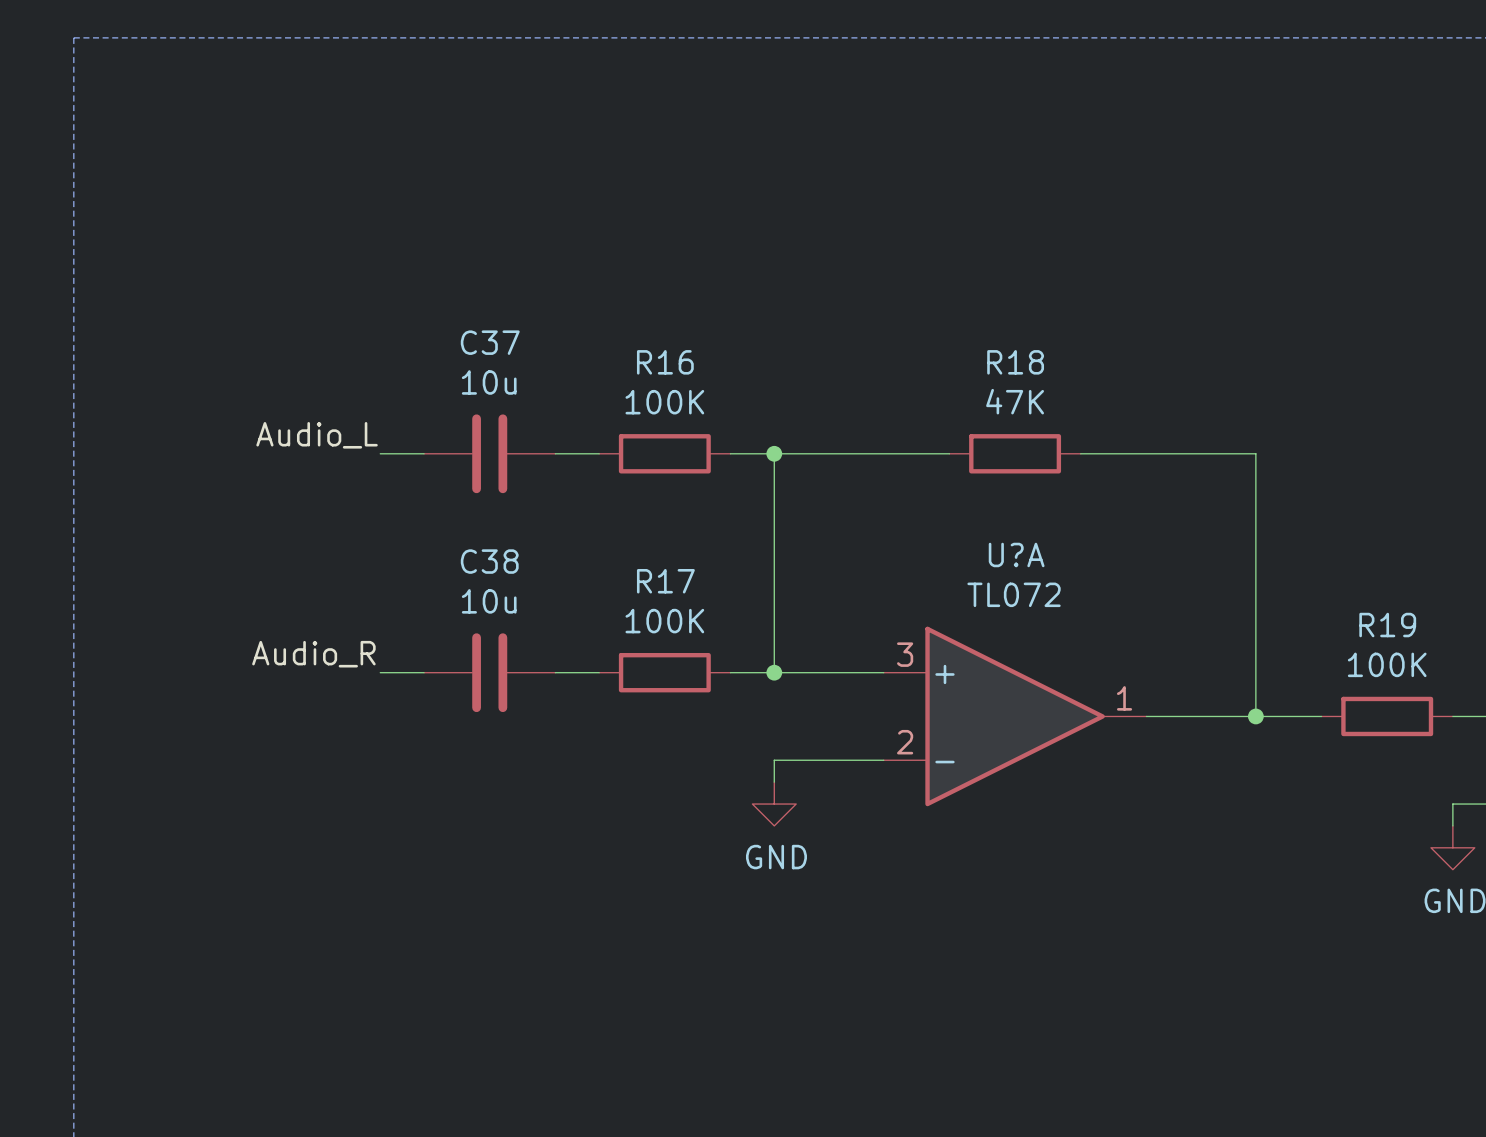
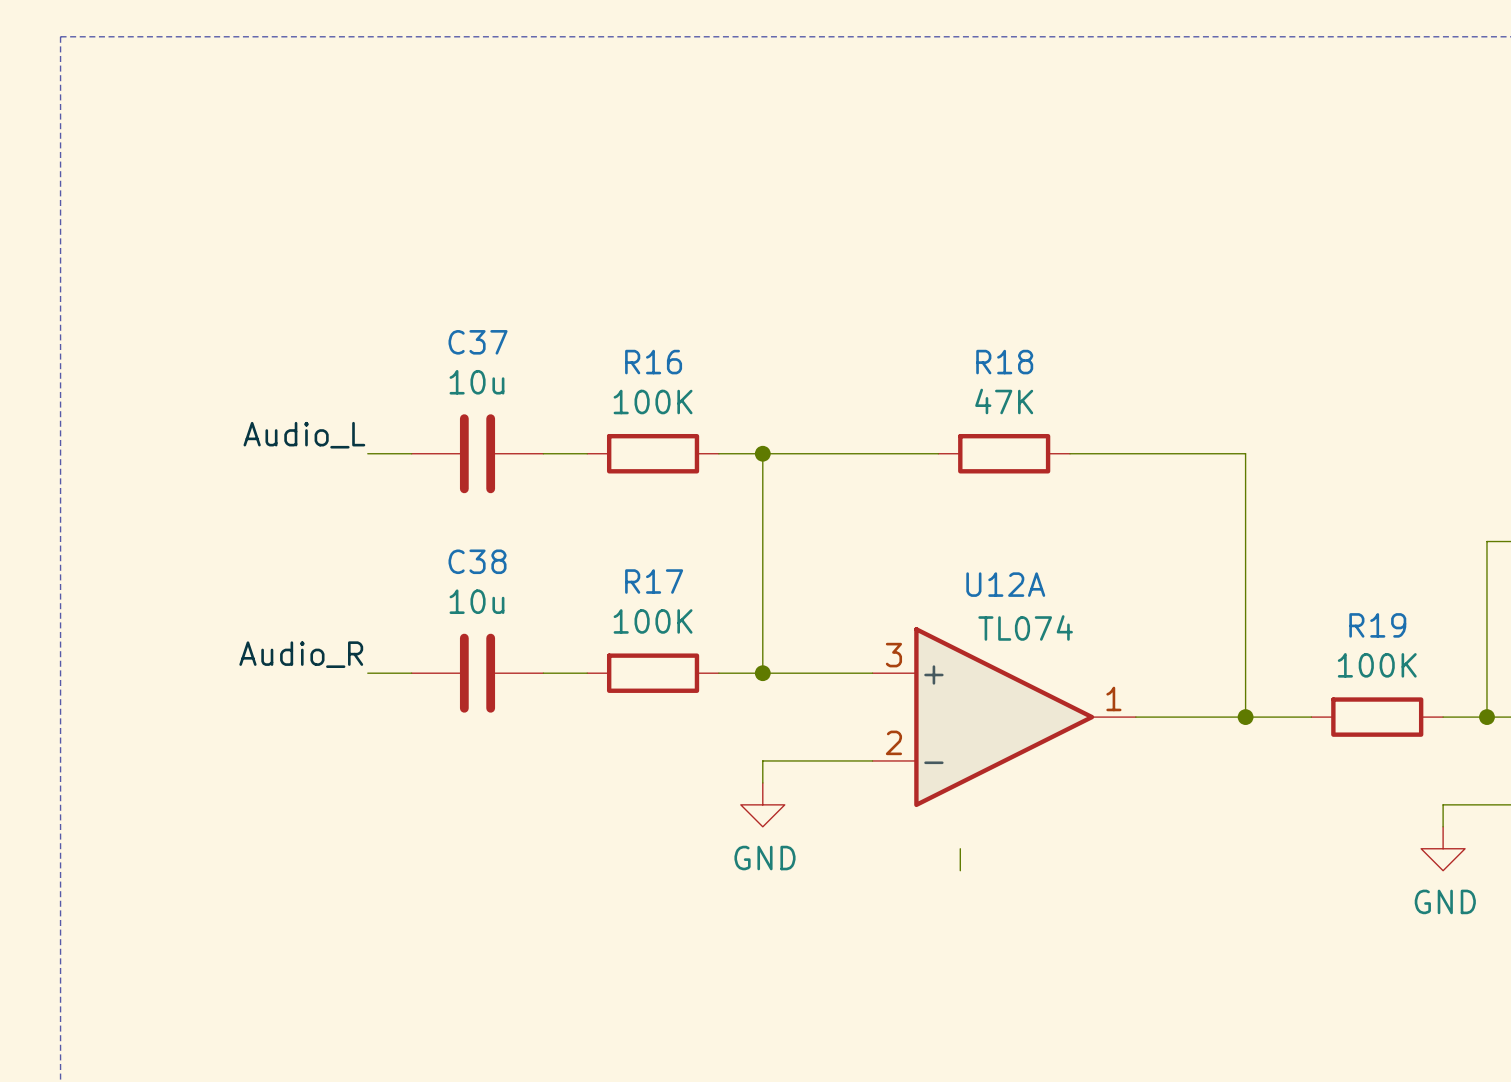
U?A name: U?A (1016, 554) -> U12A (1005, 584)
U?A value: TL072 (1014, 594) -> TL074 (1025, 627)
wire: none -> (960, 848) (960, 870)

